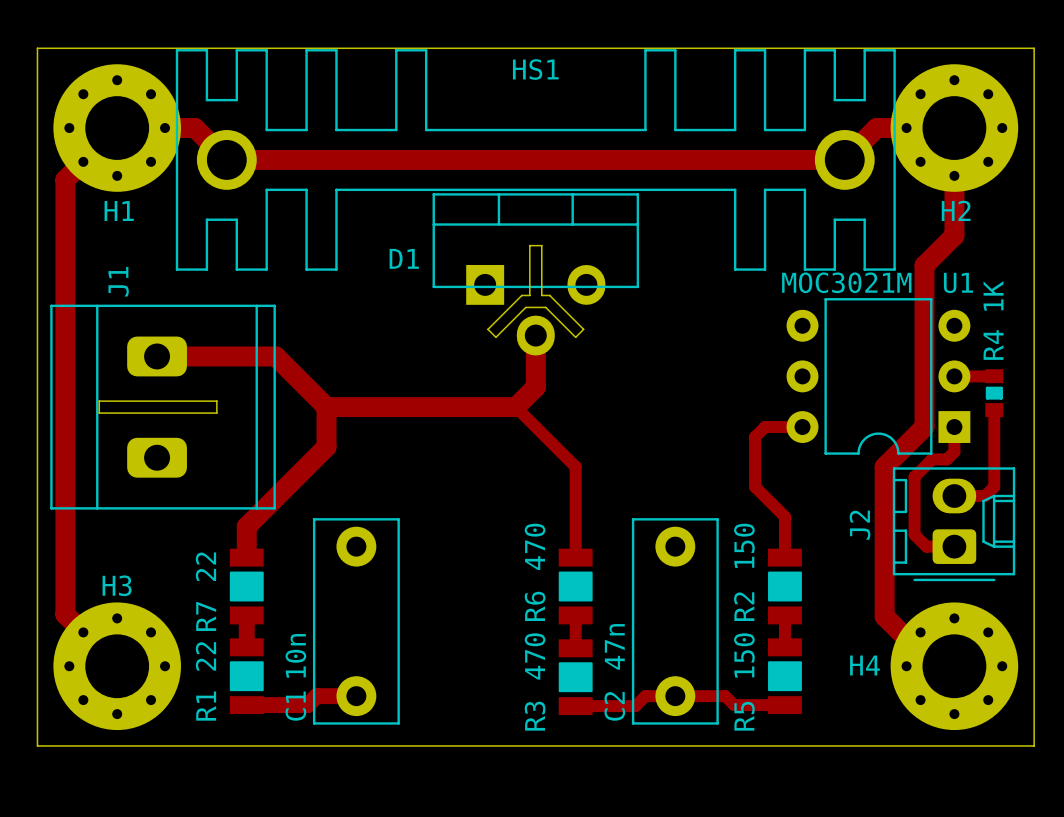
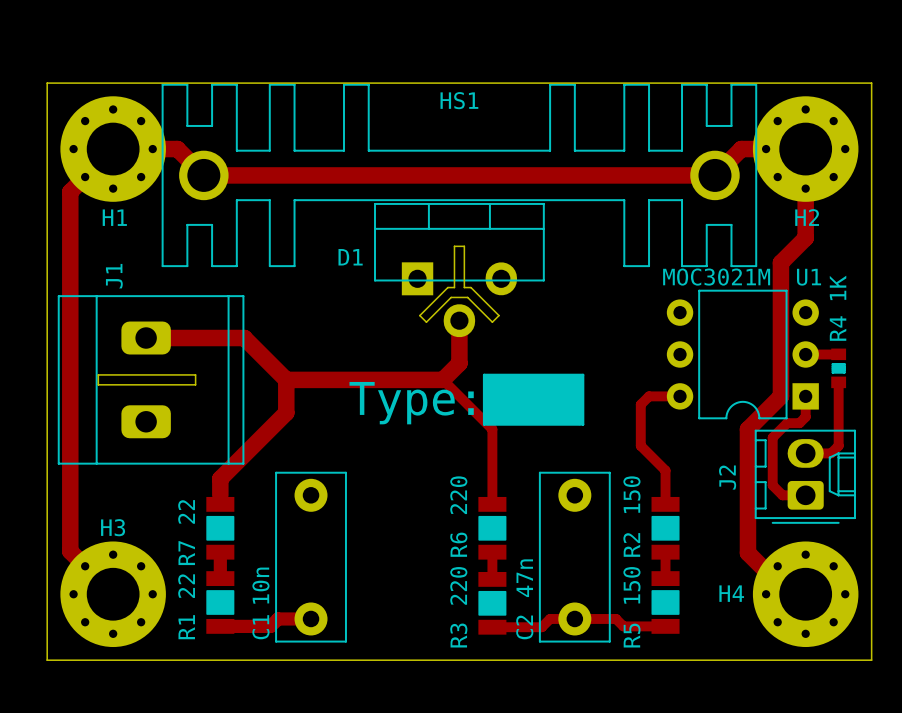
drawing: none -> [482, 373, 585, 426]
R6 value: 470 (535, 546) -> 220 (458, 495)
R3 value: 470 (535, 656) -> 220 (458, 585)

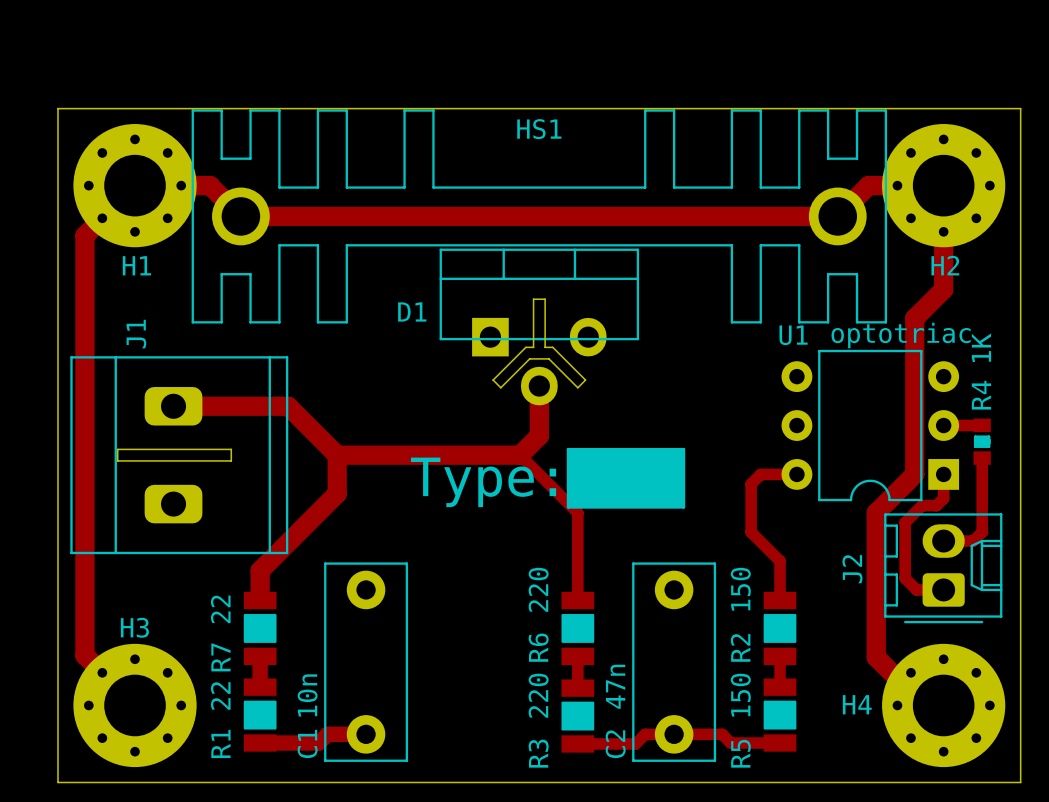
U1 value: MOC3021M (716, 277) -> optotriac (901, 335)
U1 name position: U1 (809, 277) -> U1 (793, 335)

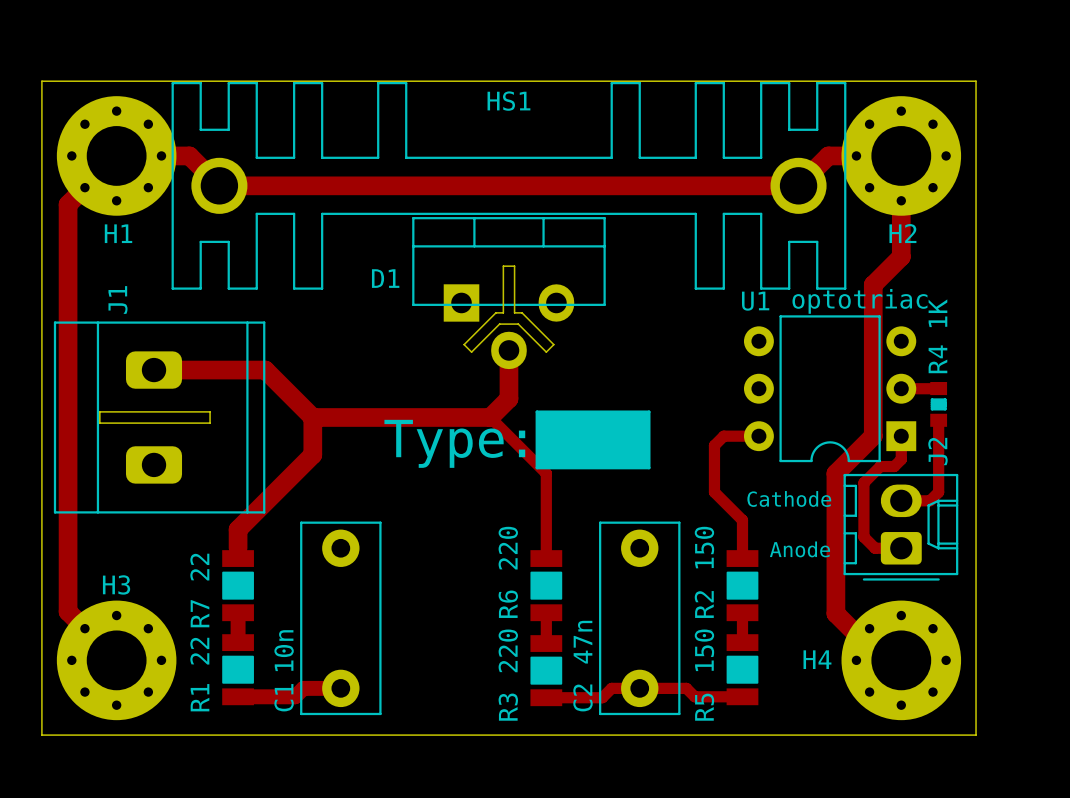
text: none -> Cathode (789, 498)
J2 name position: J2 (852, 569) -> J2 (937, 451)
text: none -> Anode (799, 549)

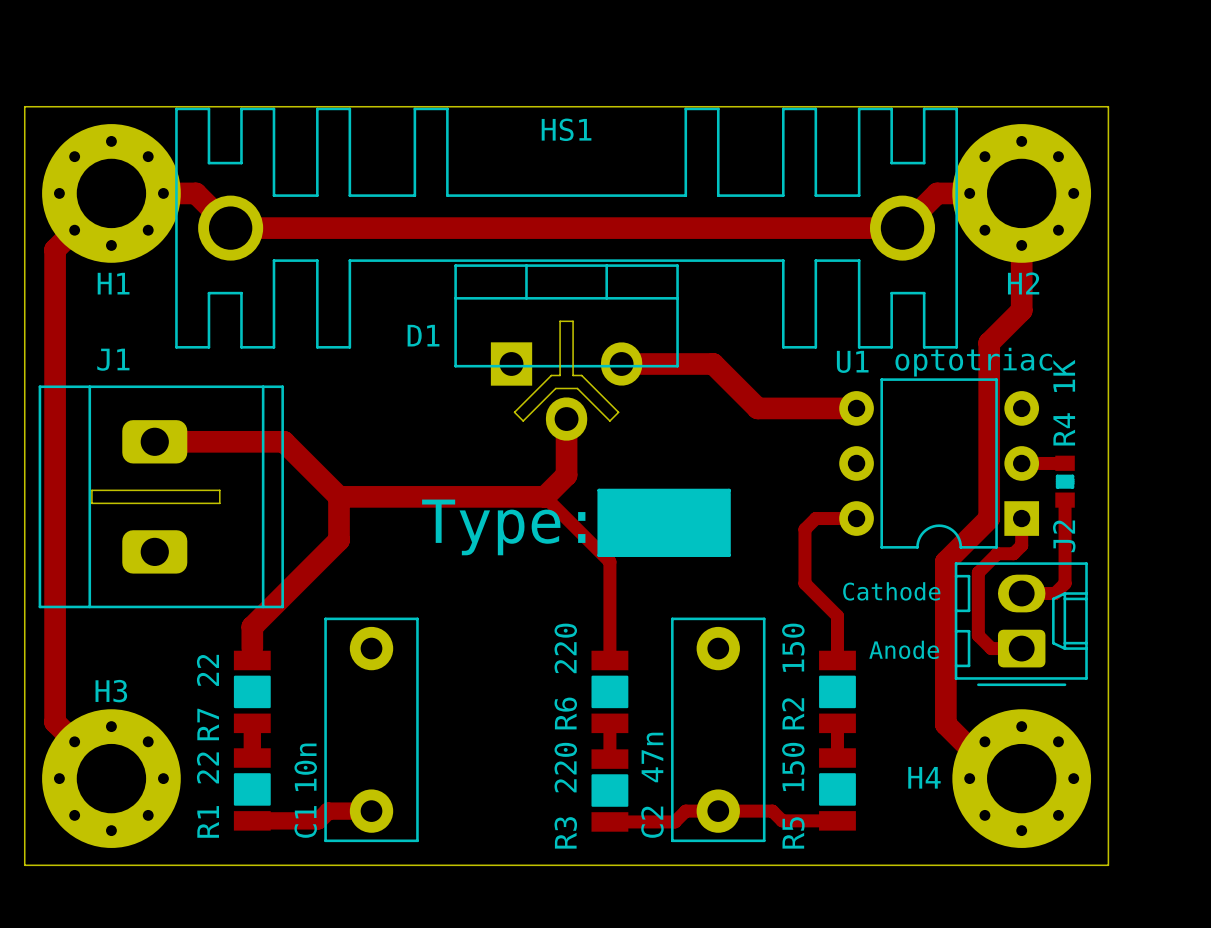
J1 name rotation: 0° (118, 299) -> 90° clockwise (113, 359)
track: none -> (621, 364) (713, 364) (757, 408) (856, 408)

